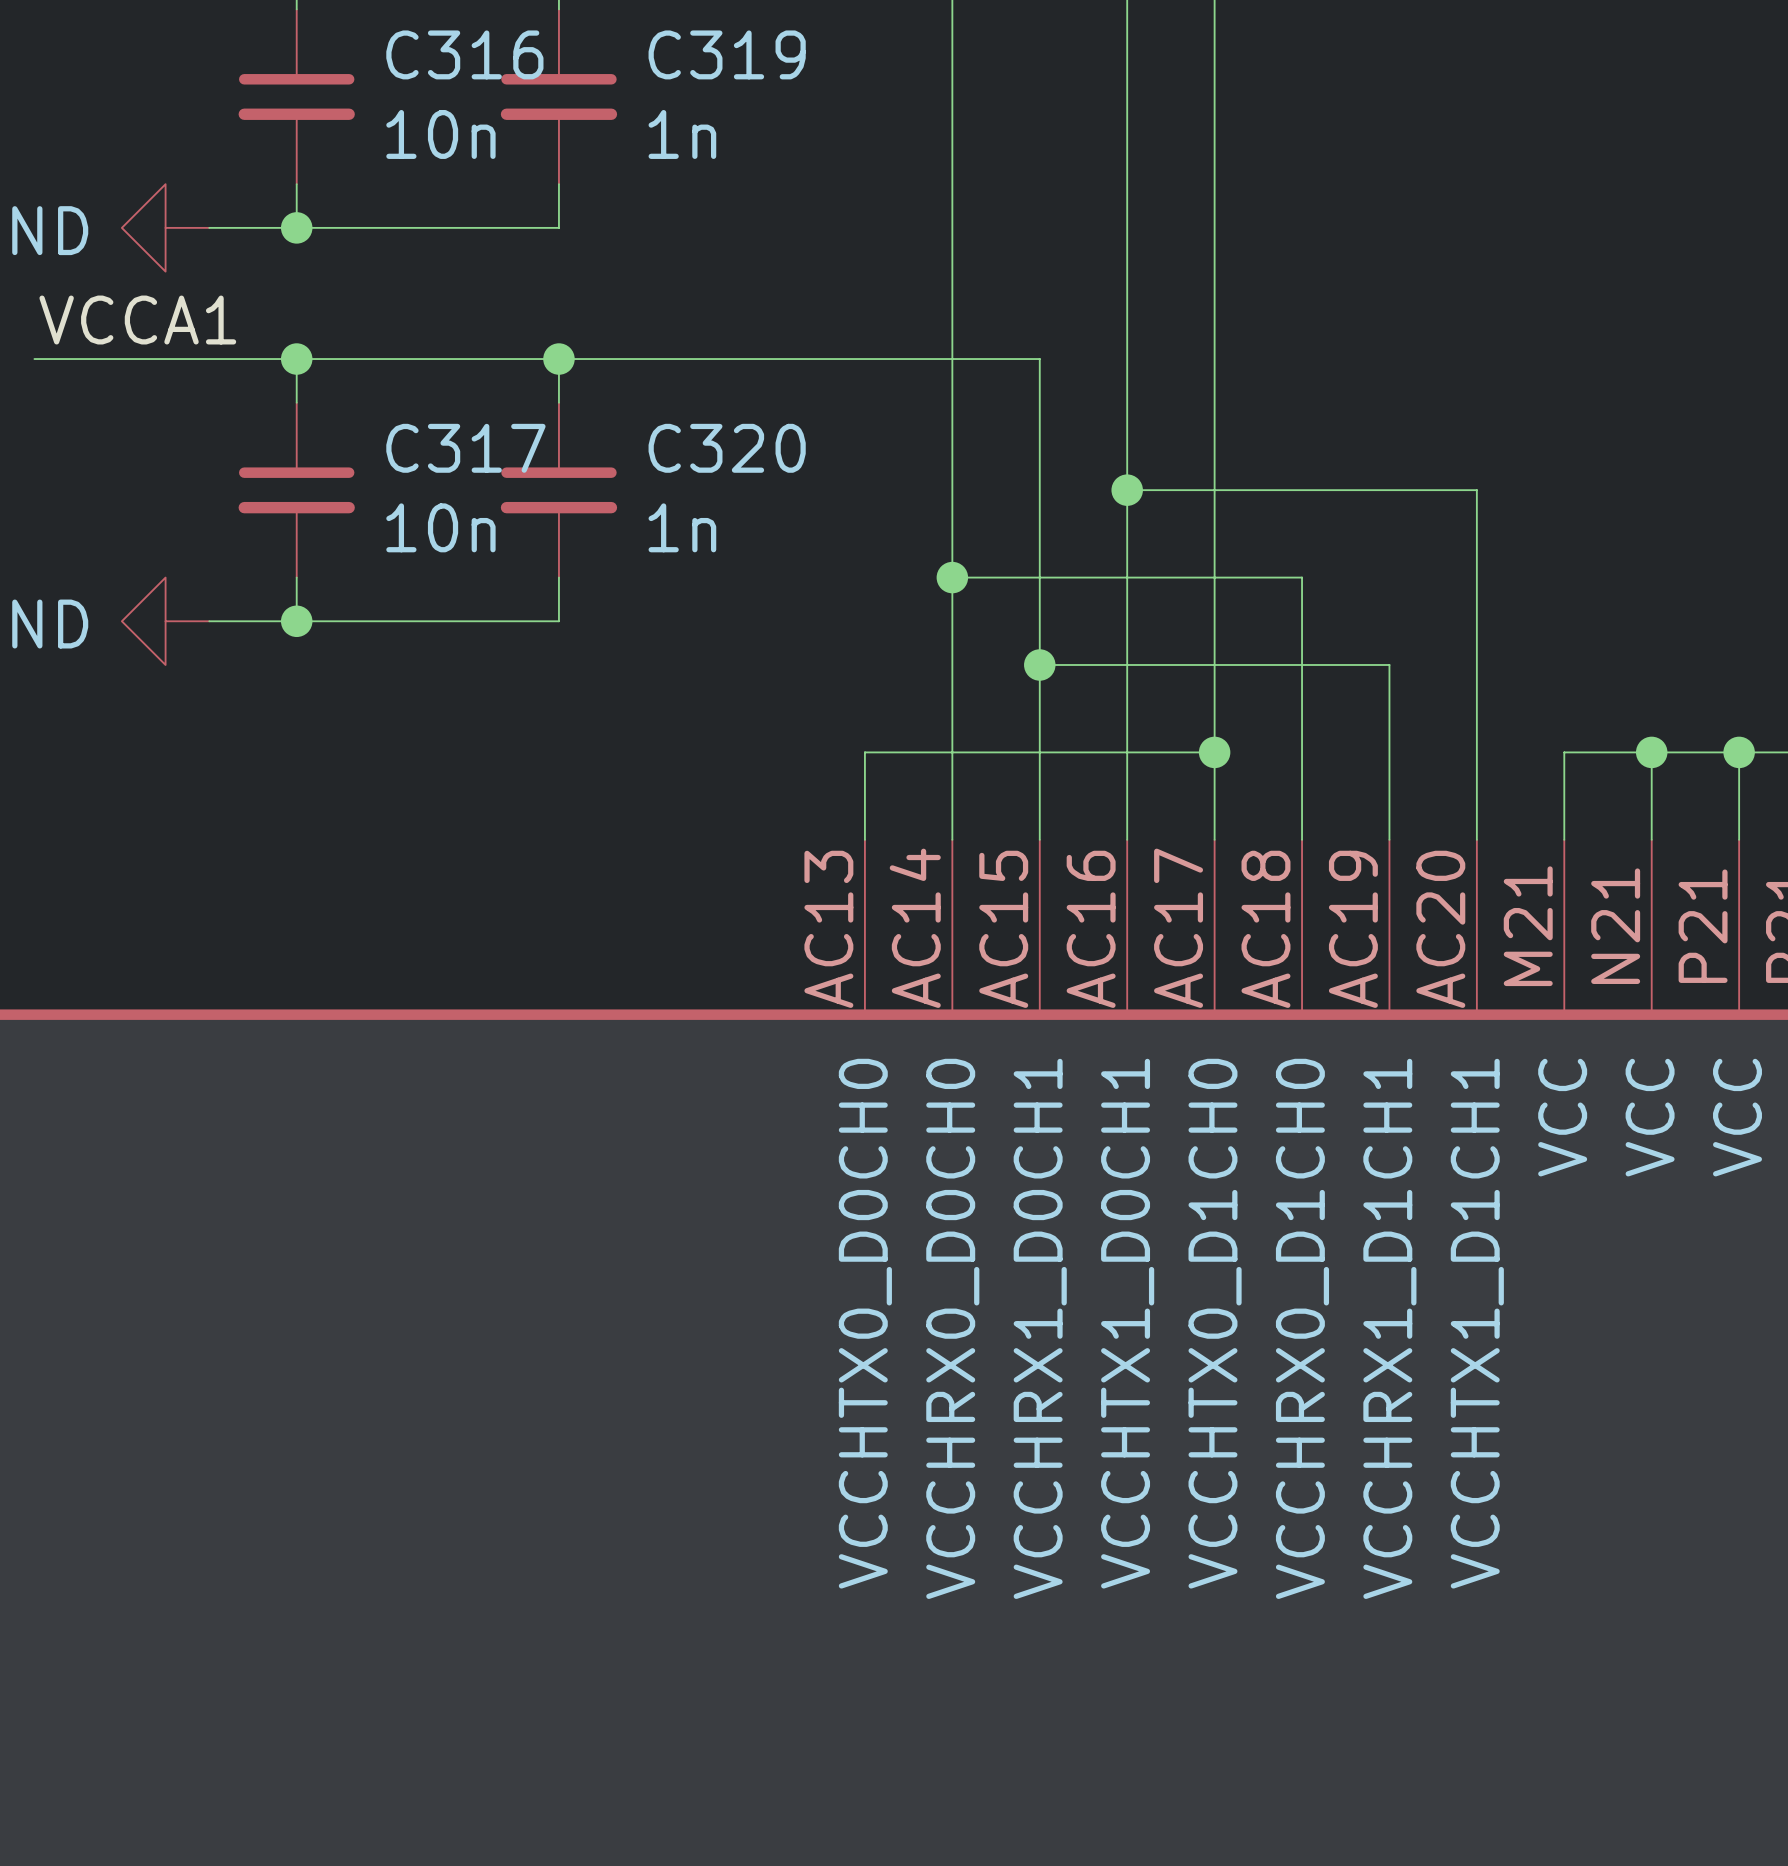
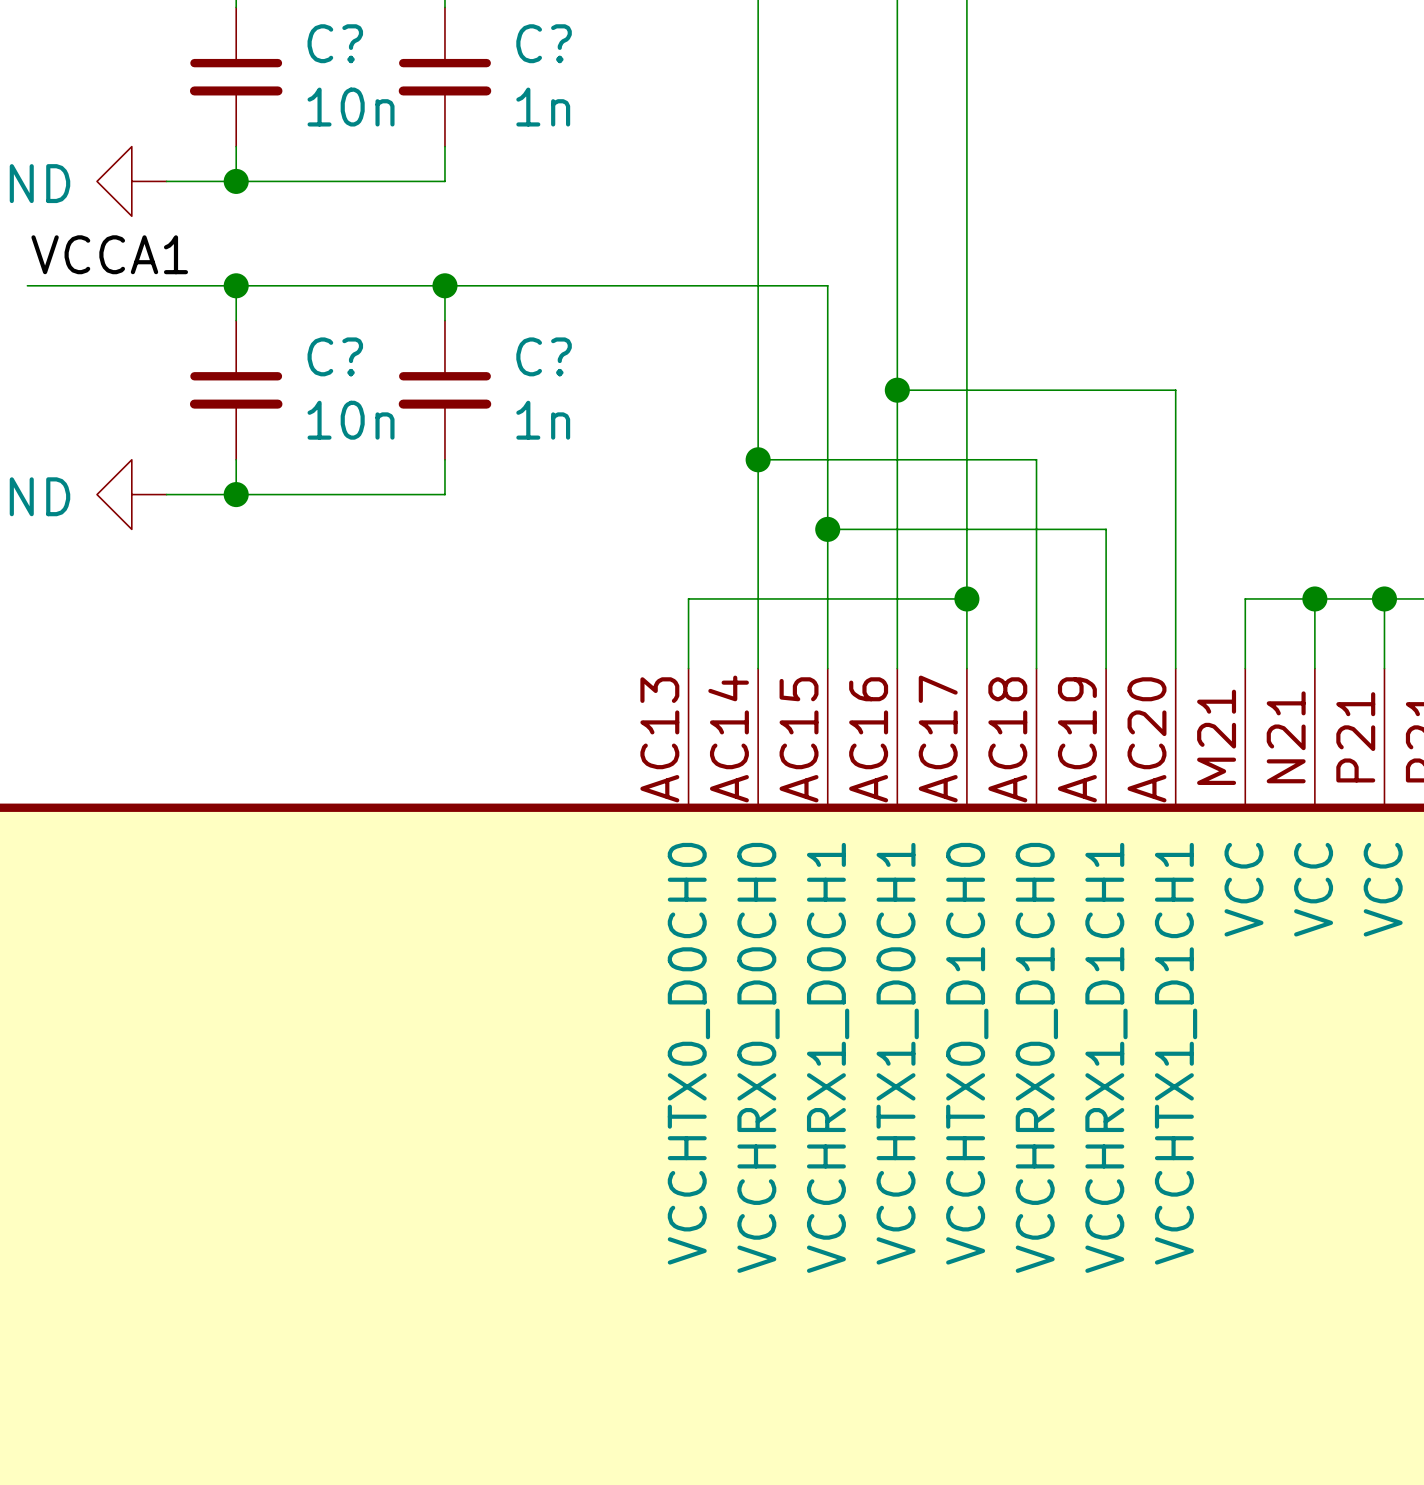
C316 name: C316 (464, 54) -> C? (335, 43)
C319 name: C319 (727, 54) -> C? (544, 43)
C317 name: C317 (465, 448) -> C? (335, 356)
C320 name: C320 (727, 448) -> C? (544, 356)

